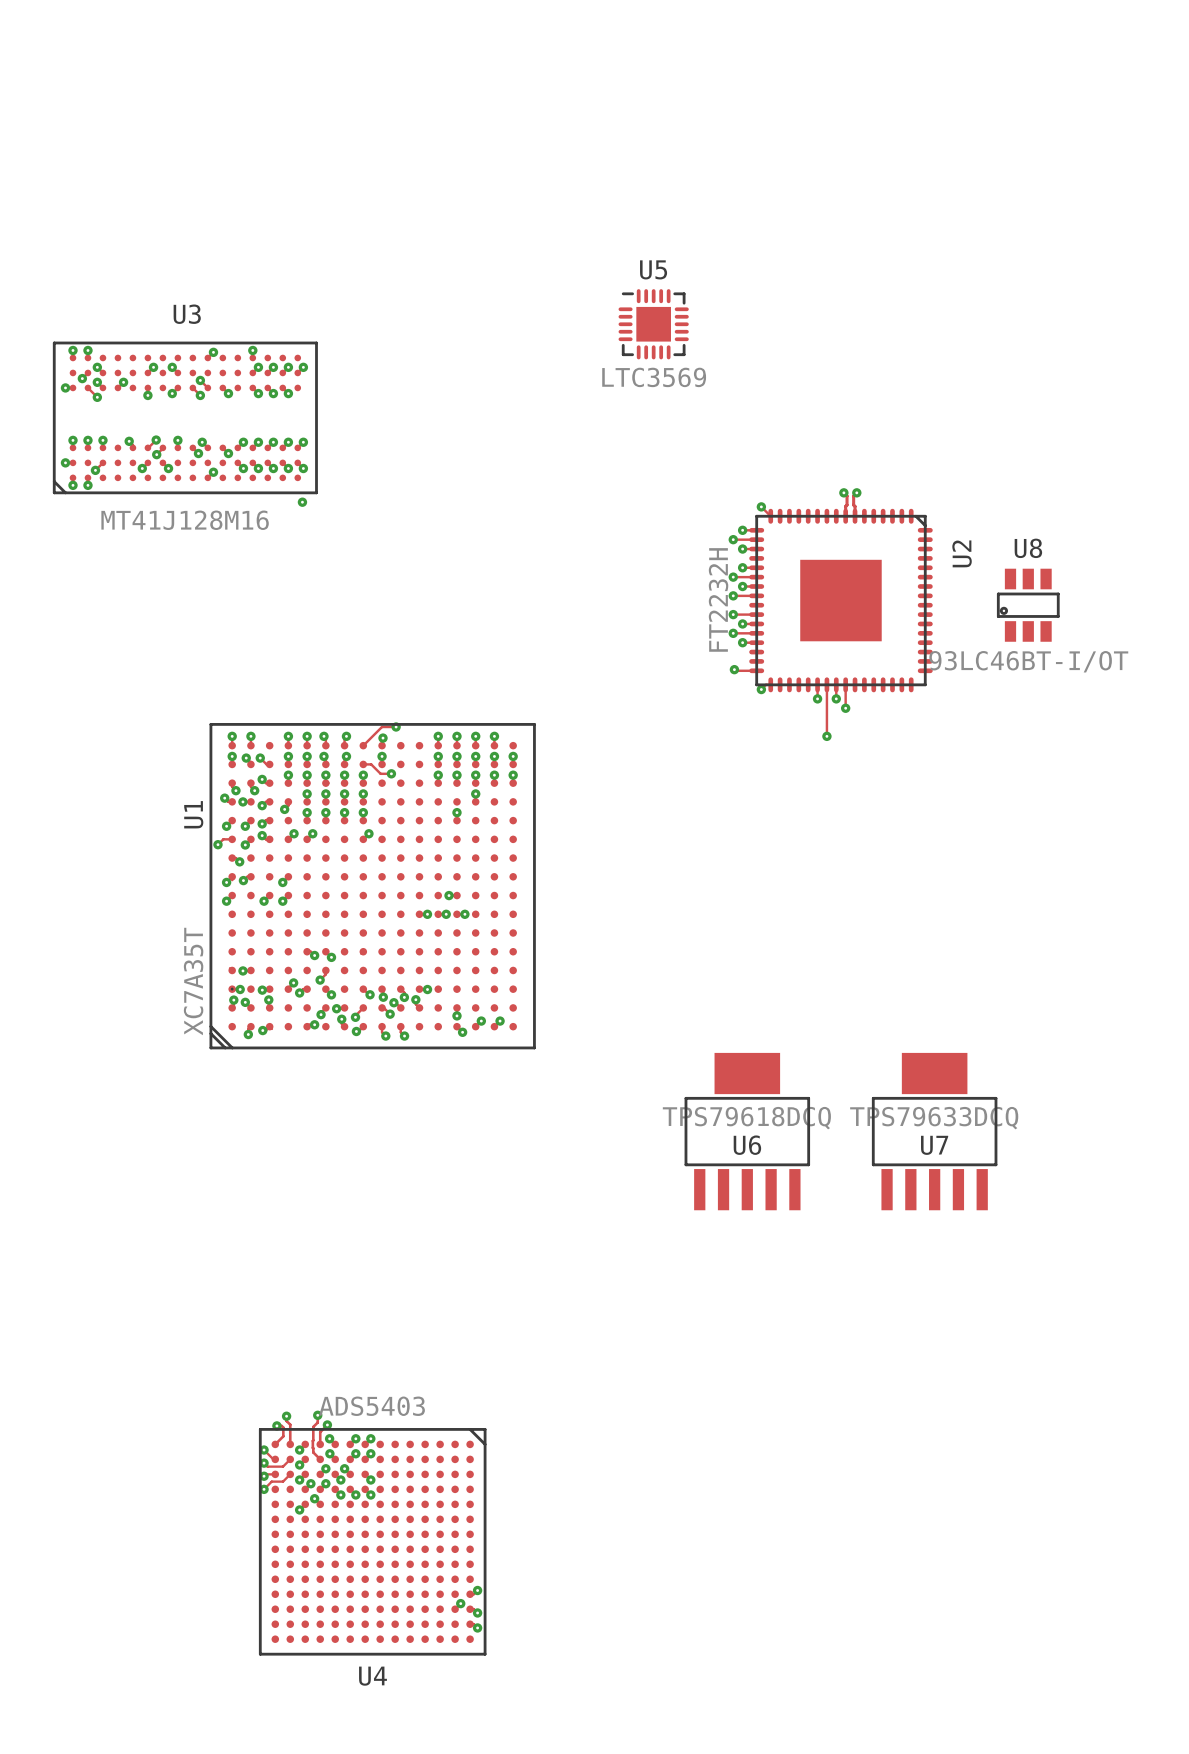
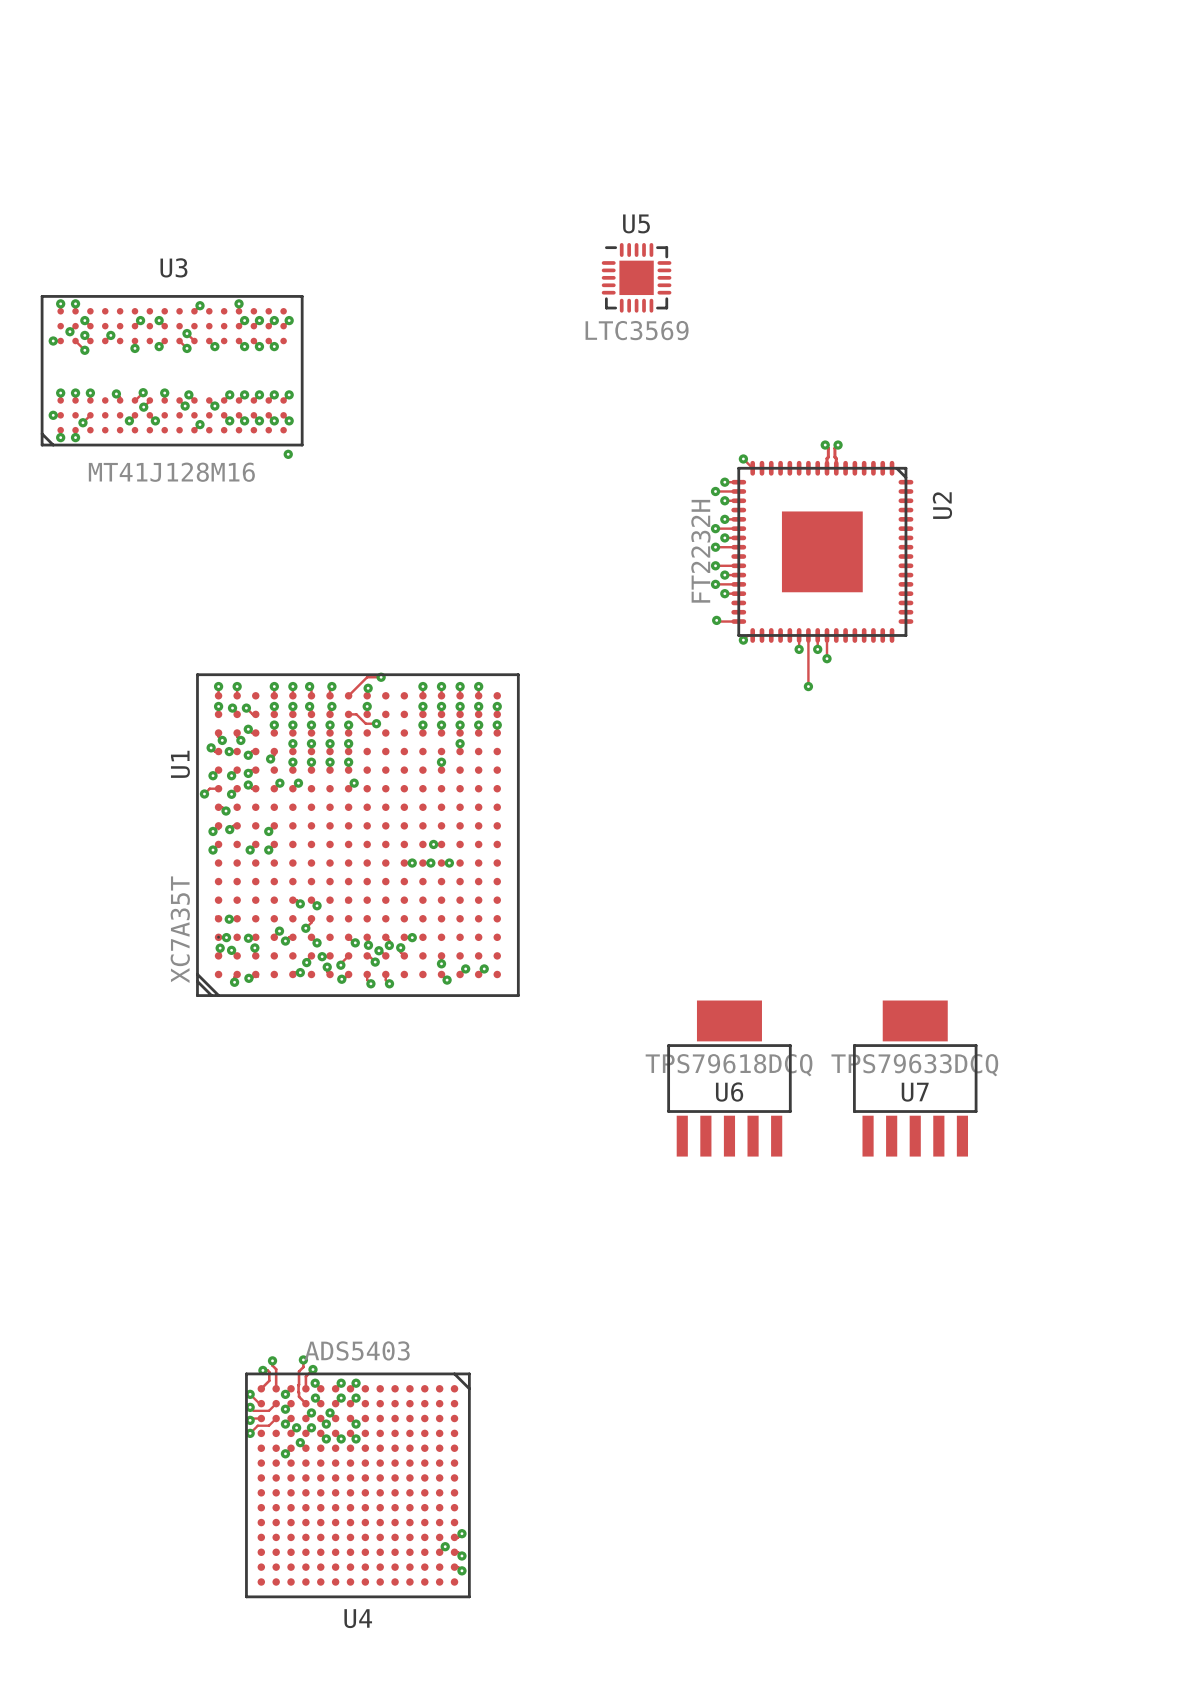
U8: 93LC46BT-I/OT (1028, 605) -> none

